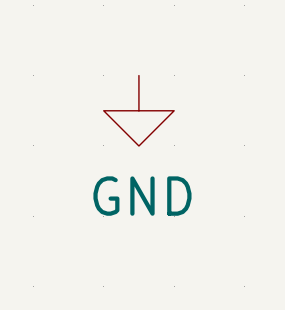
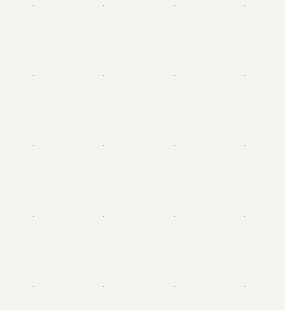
power symbol: GND (138, 110) -> none

